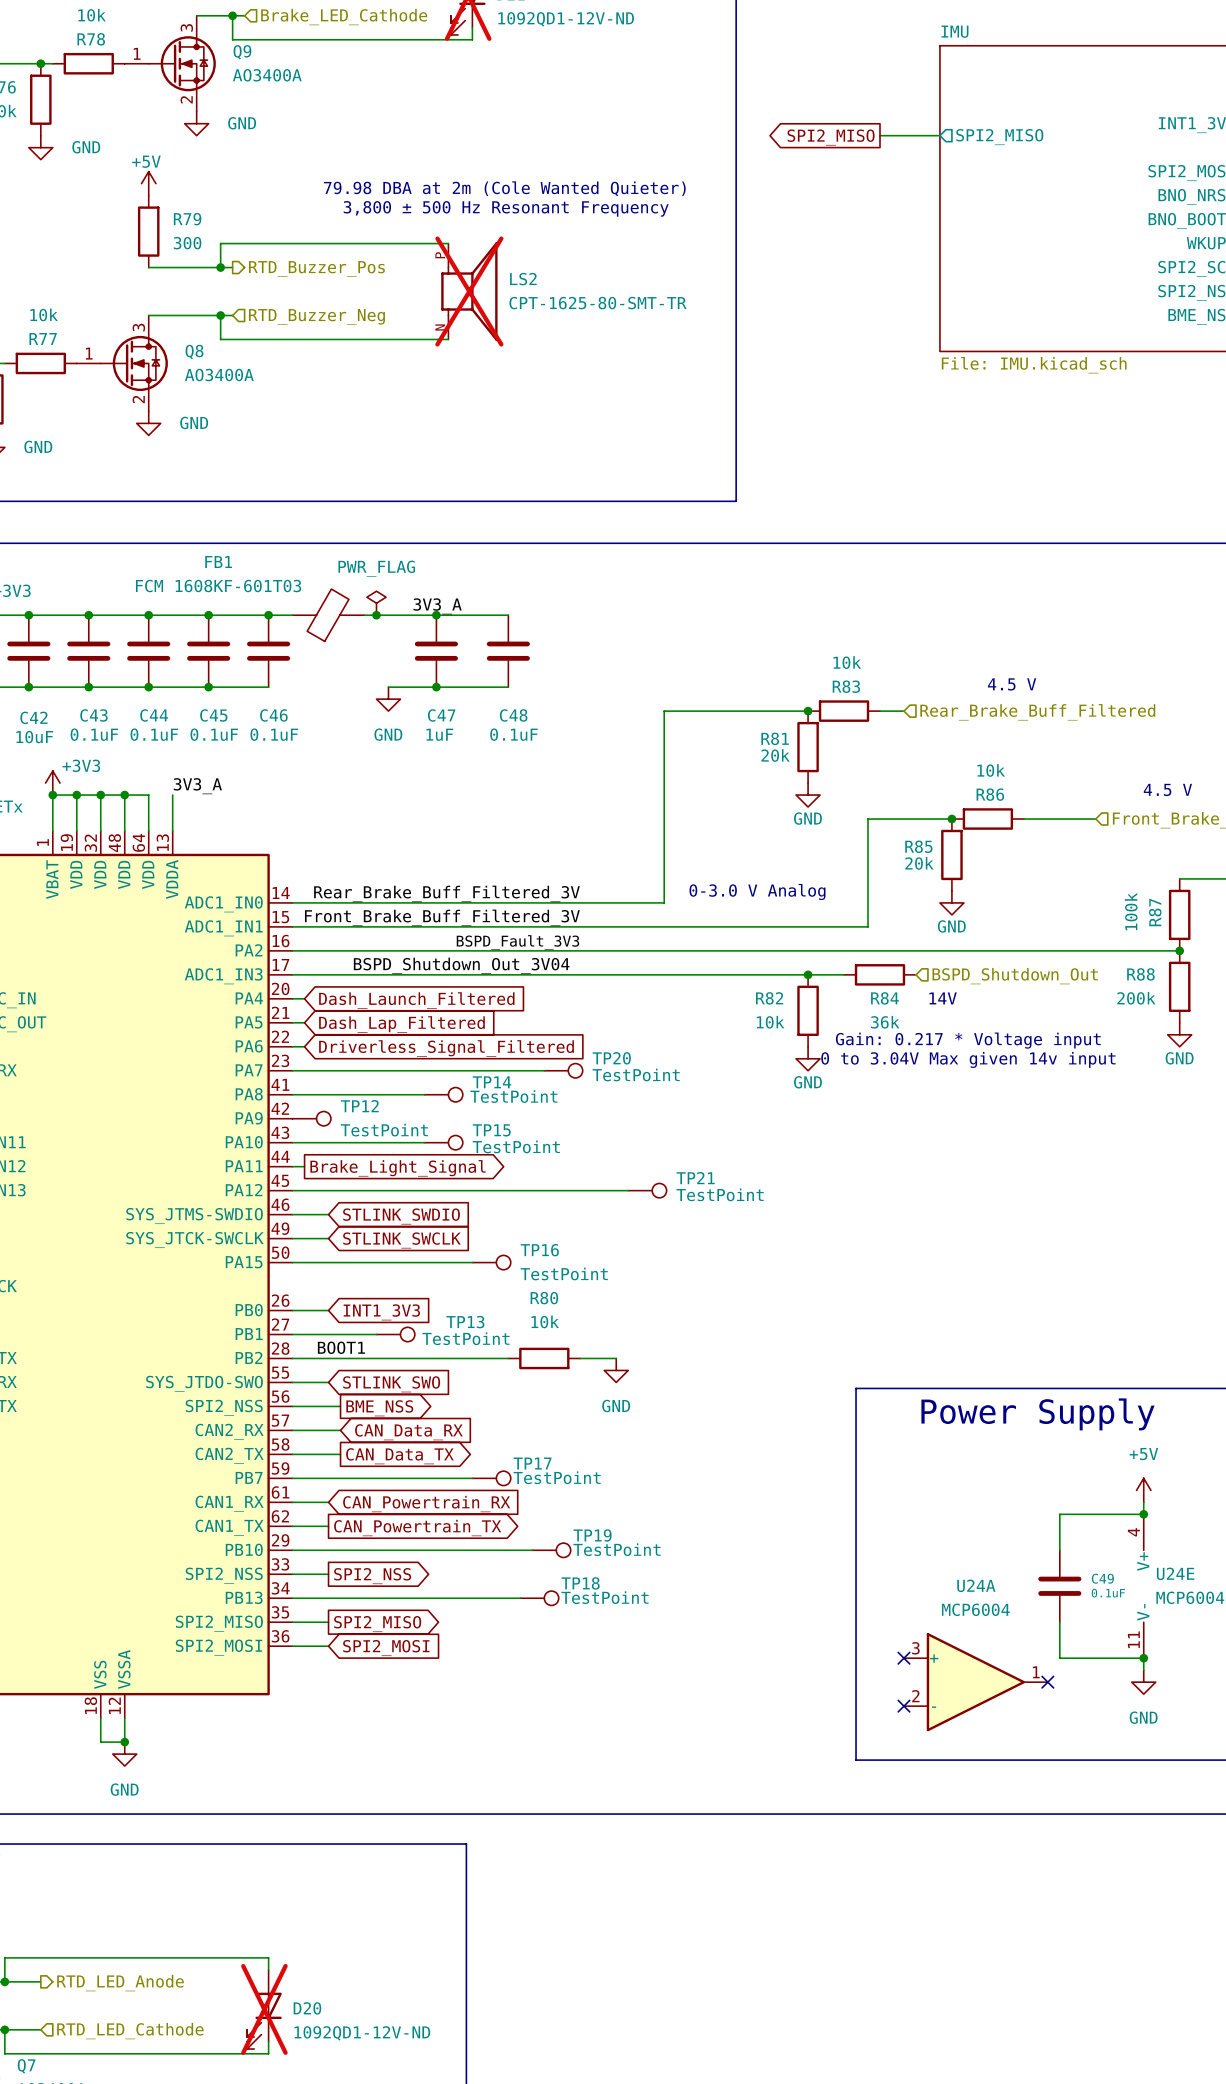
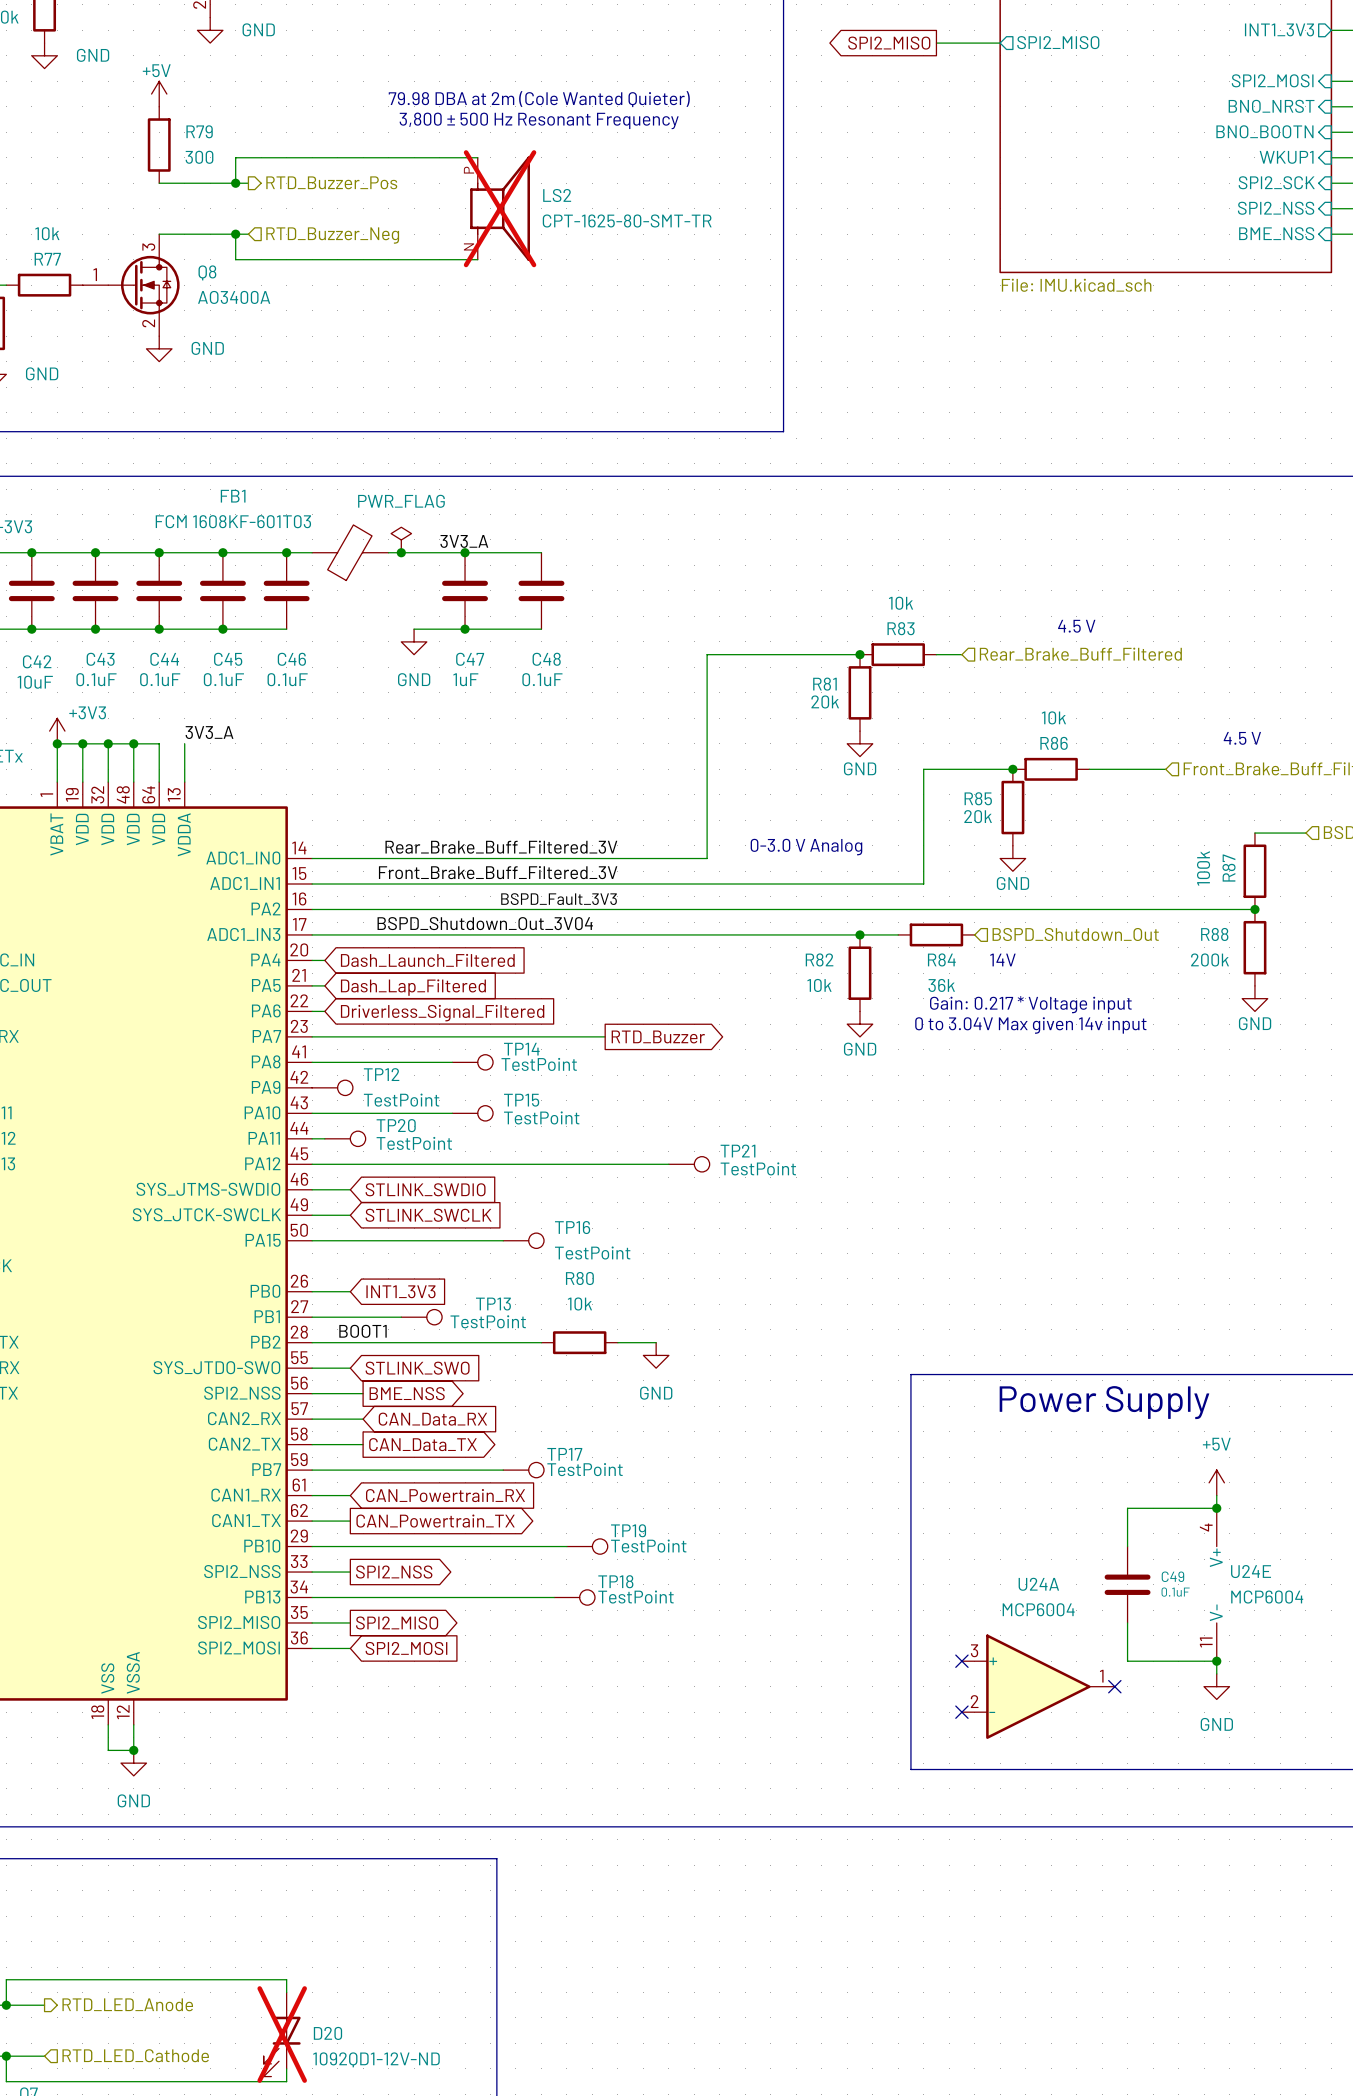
TP20 position: (563, 1070) -> (345, 1138)
global label: none -> RTD_Buzzer (658, 1036)
global label: Brake_Light_Signal (398, 1168) -> none

